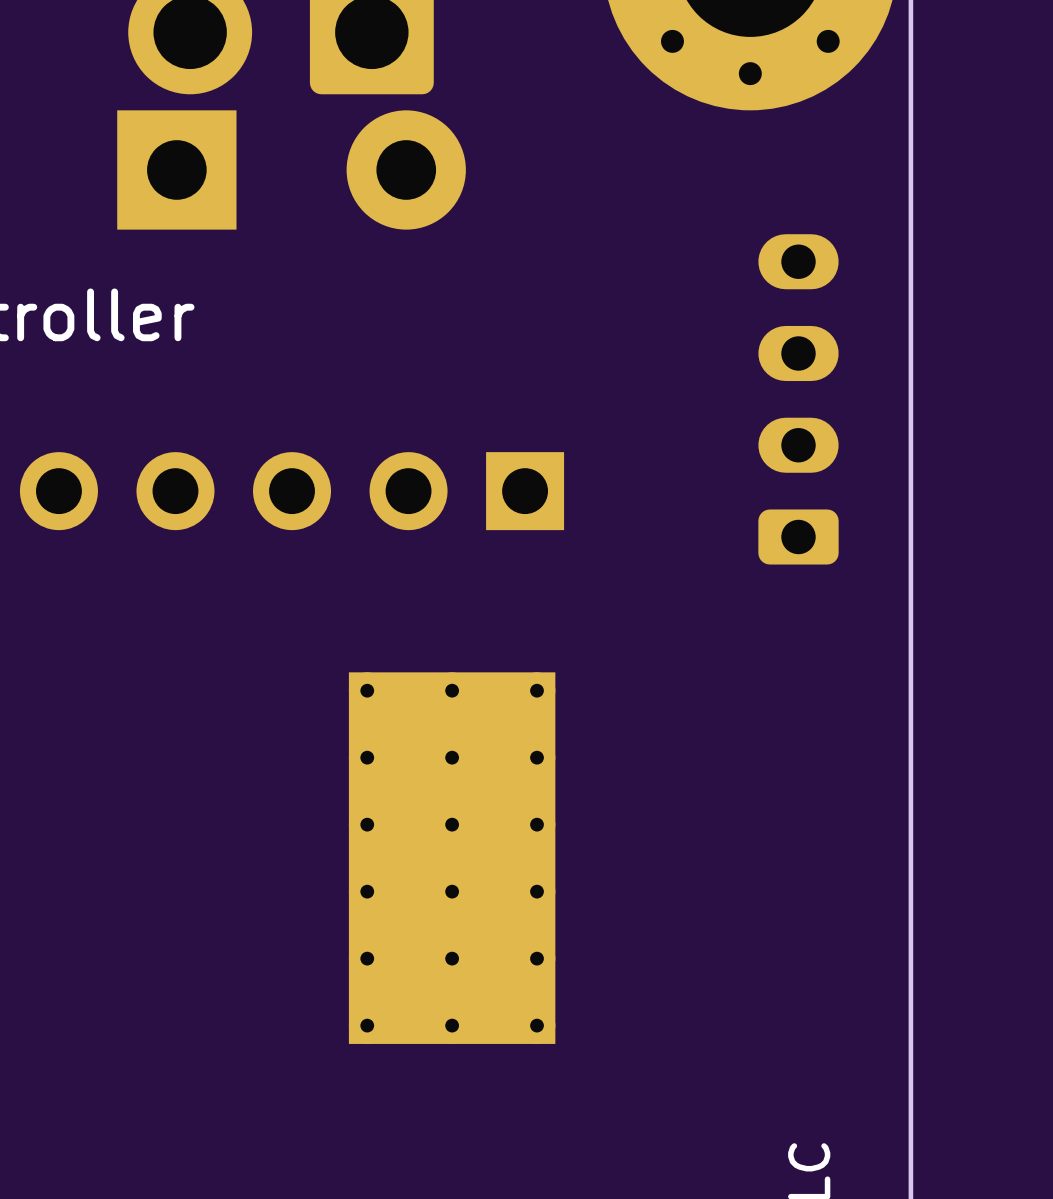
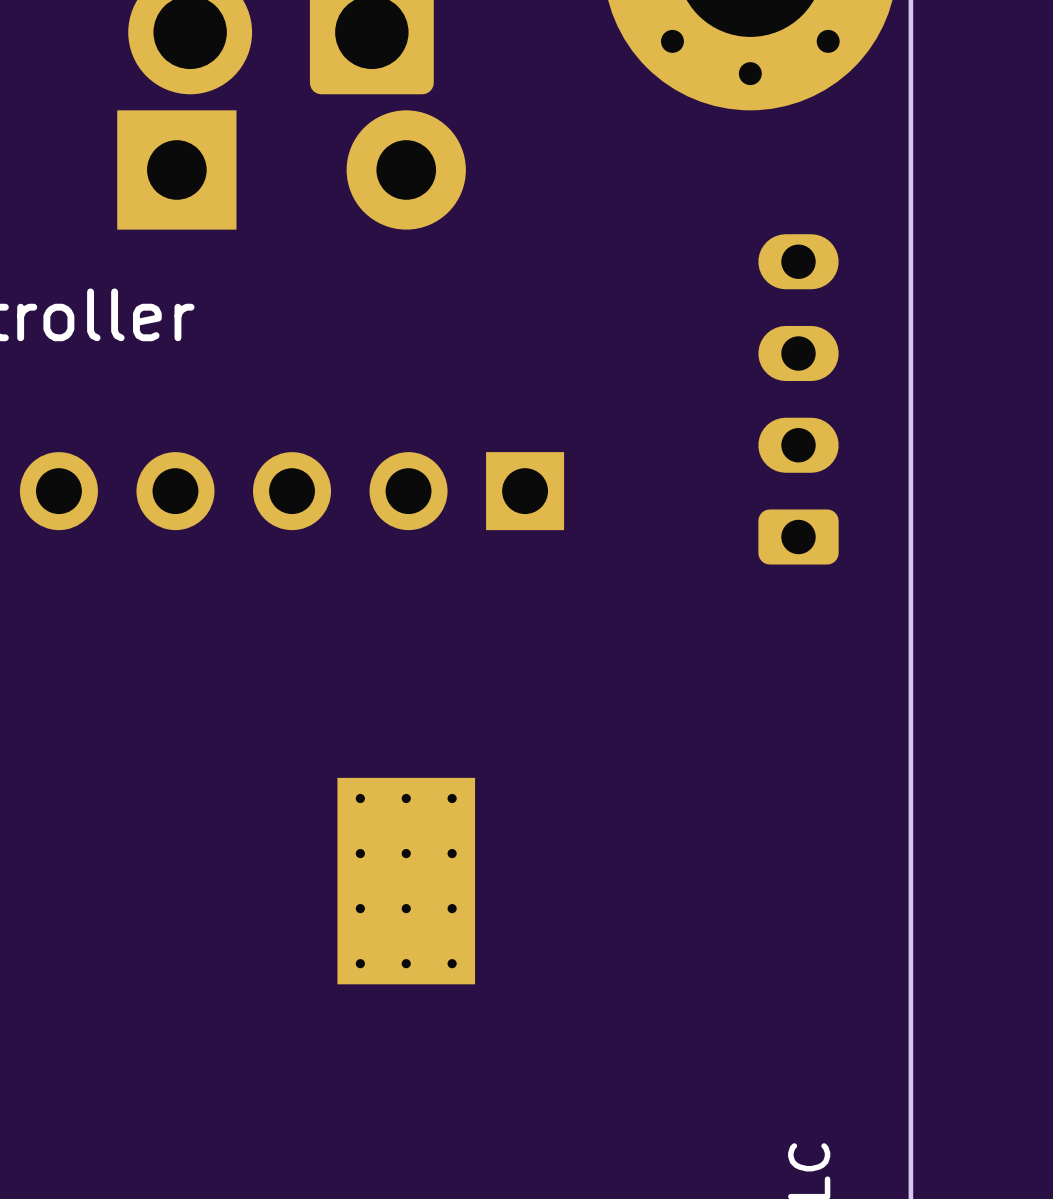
part: (452, 858) -> none
part: none -> (406, 881)

